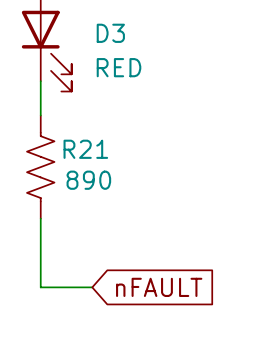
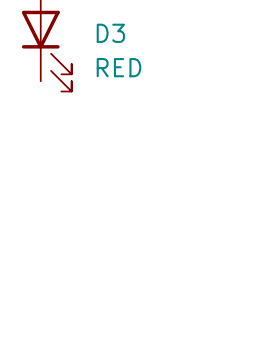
wire: (40, 81) (40, 115) -> none
R21: 890 (40, 167) -> none
wire: (40, 218) (40, 287) (92, 287) -> none
global label: nFAULT (159, 287) -> none

